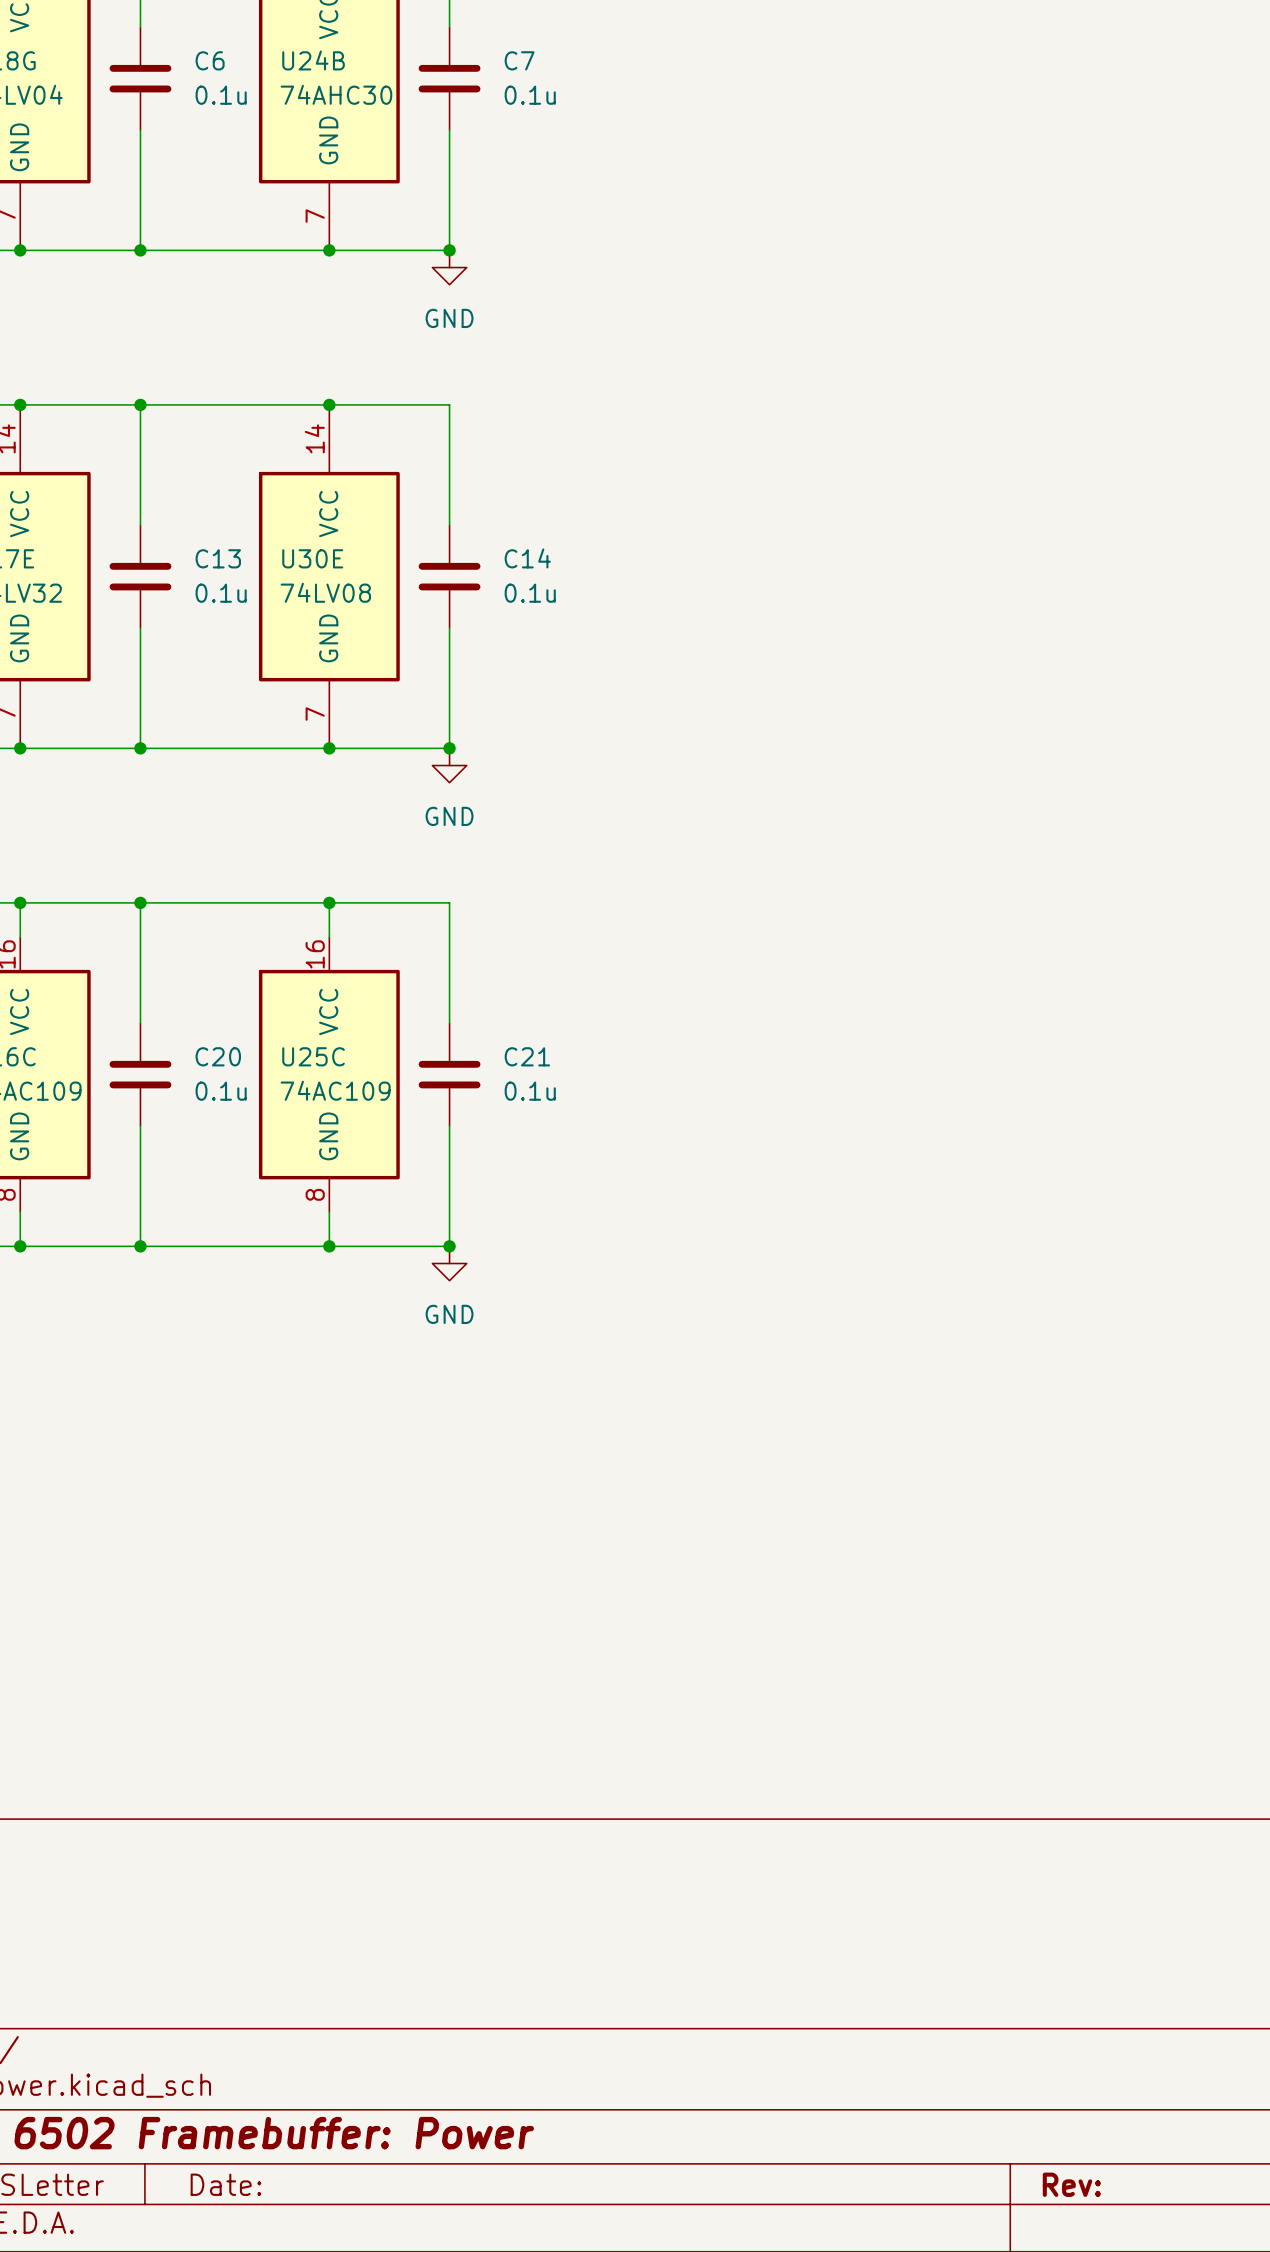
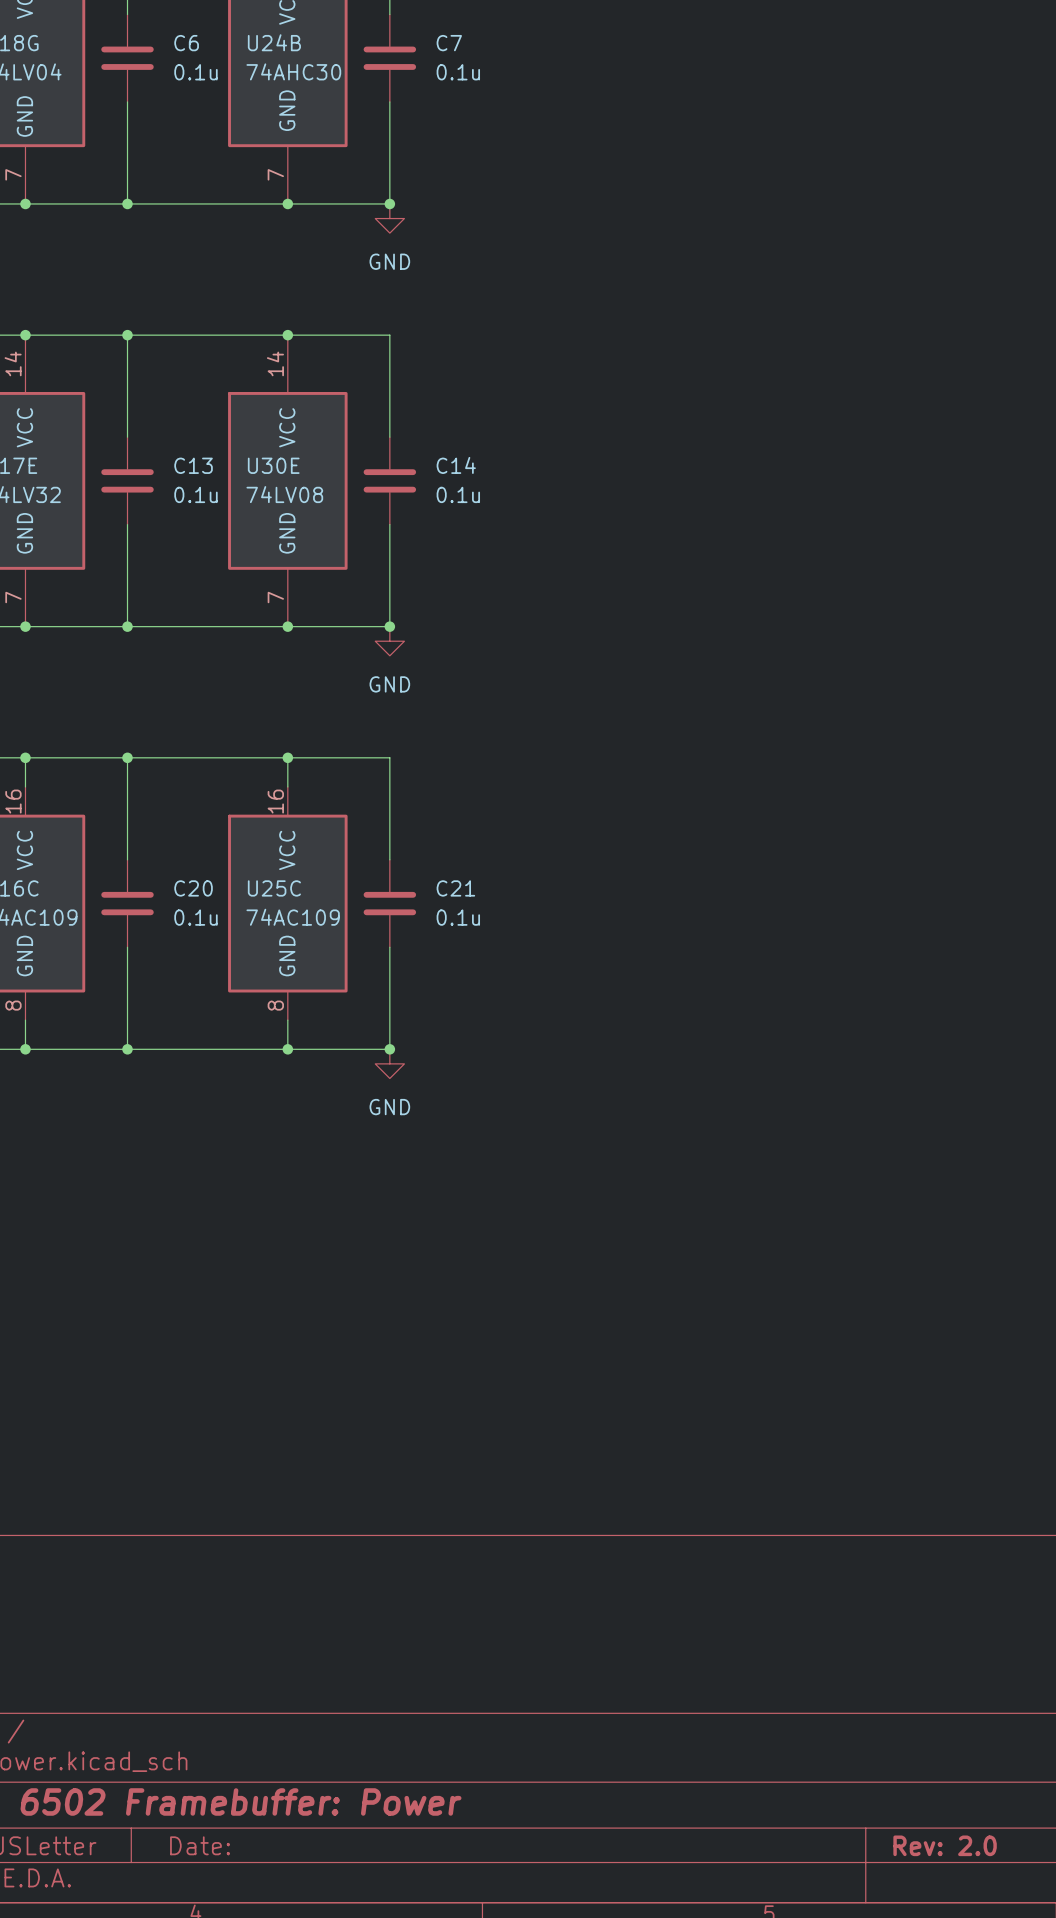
title block: Rev: (1071, 2184) -> Rev: 2.0 (945, 1845)

